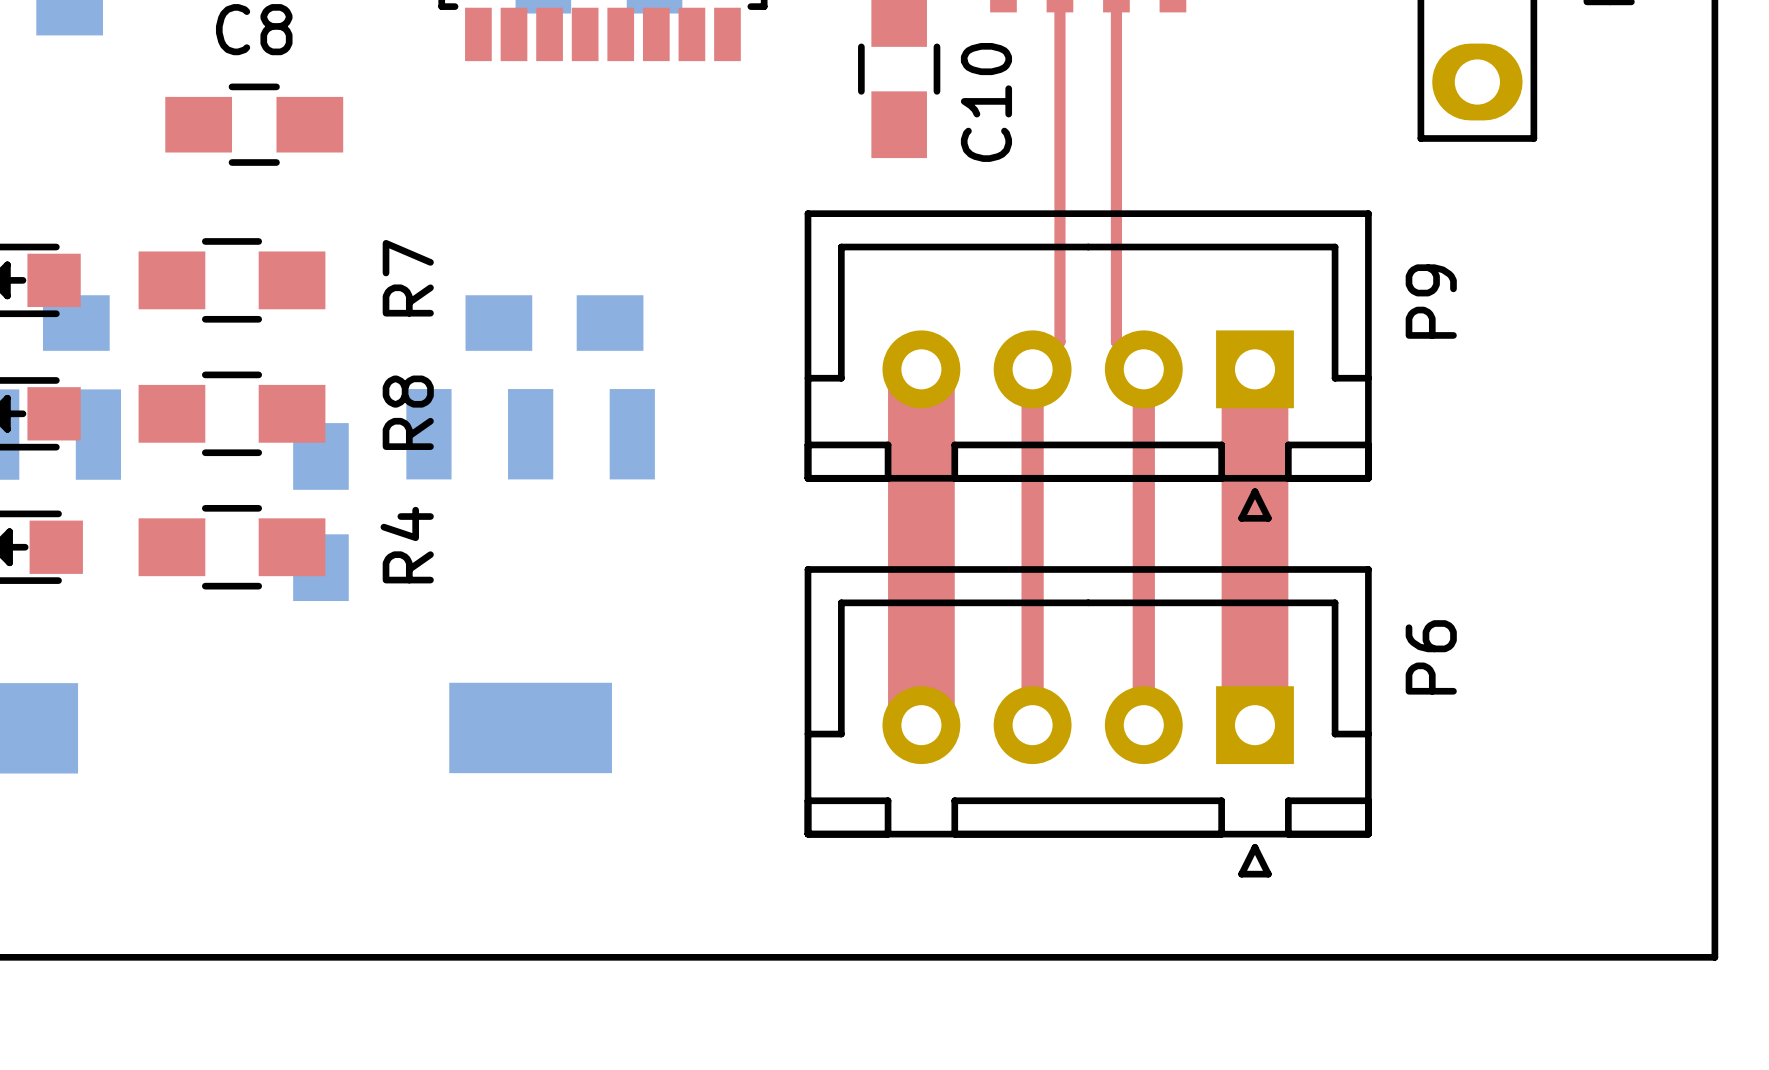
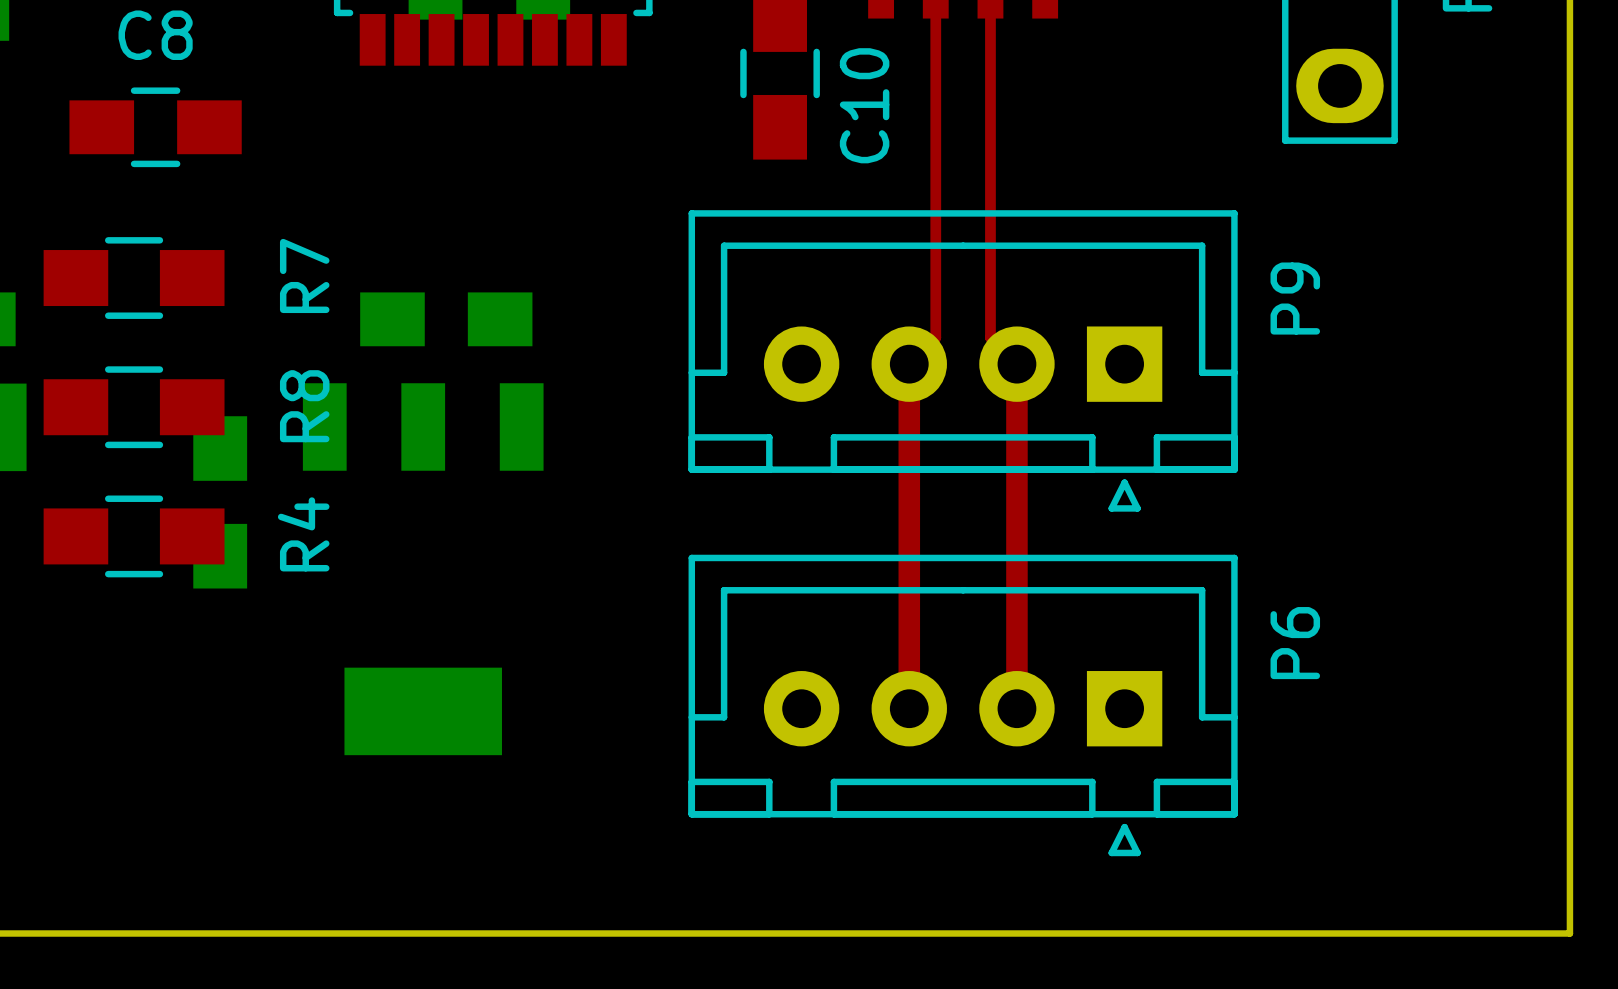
top track: (921, 369) (921, 725) -> none
top track: (1254, 369) (1254, 725) -> none

